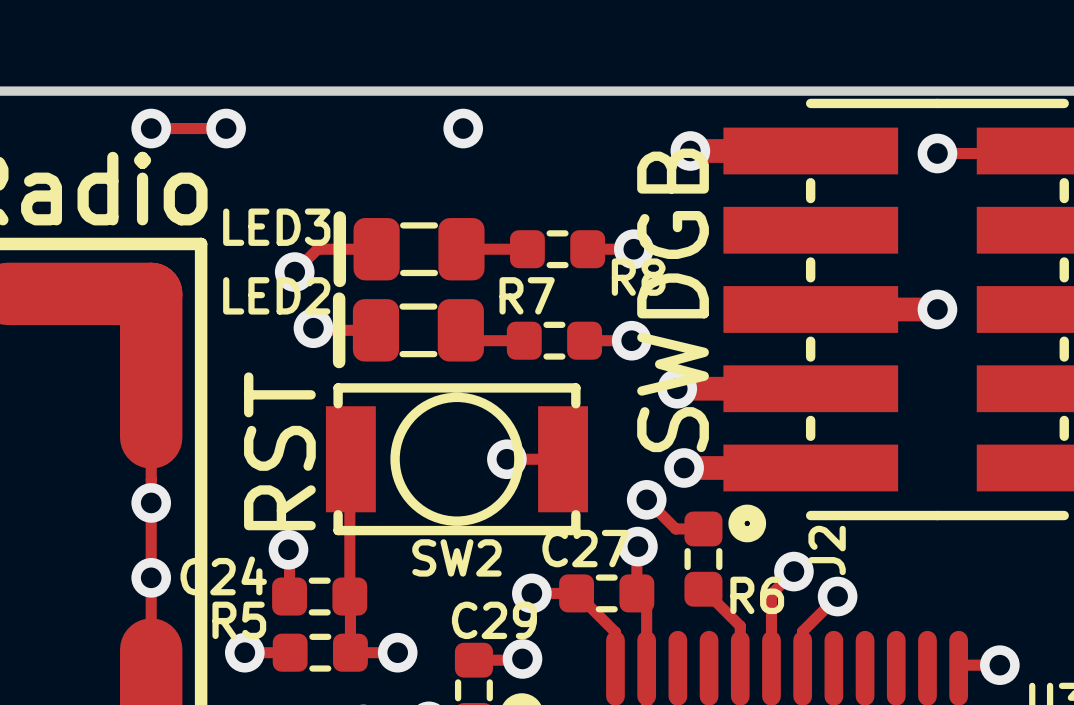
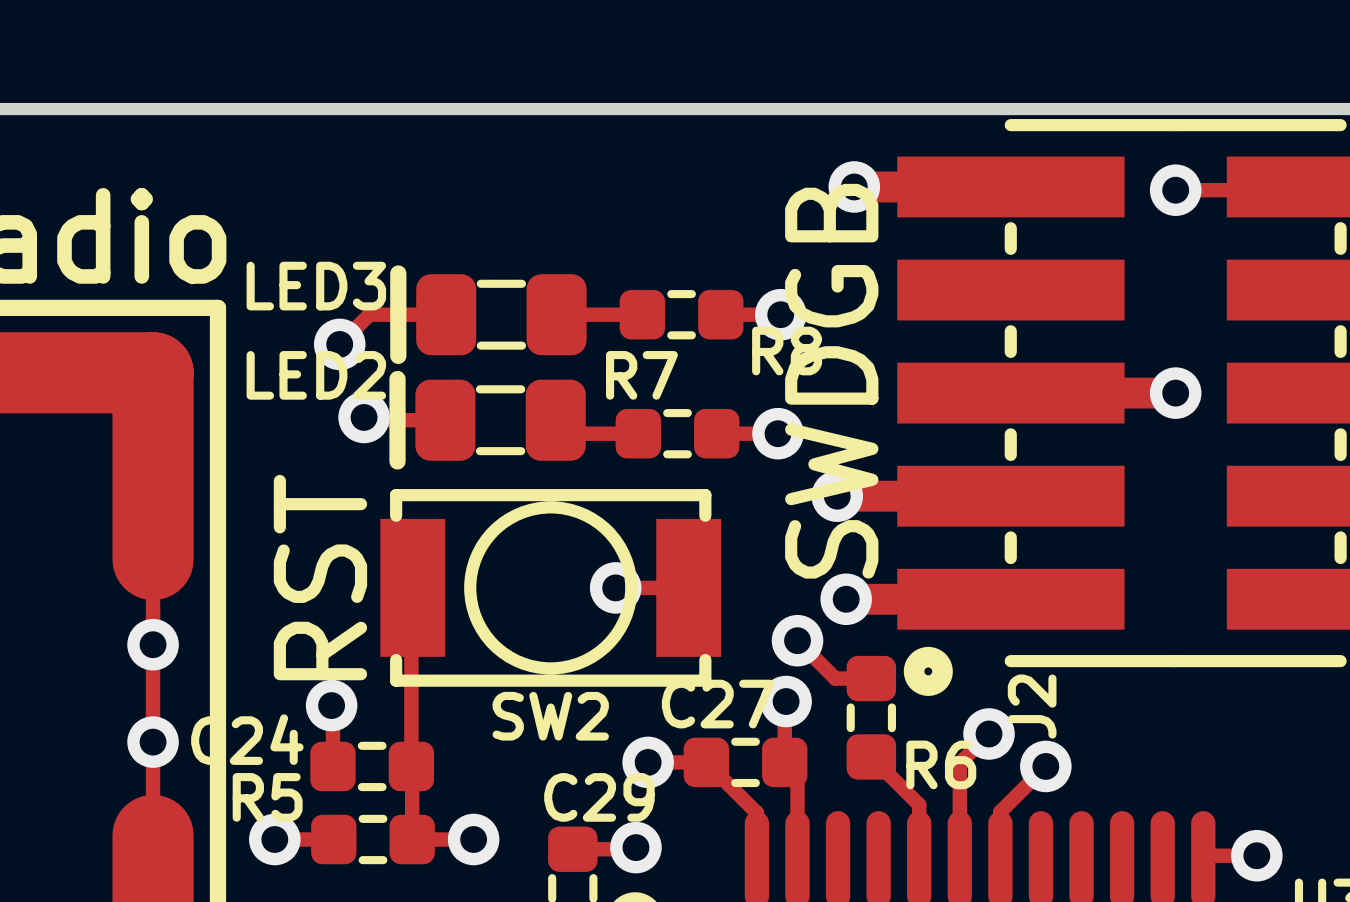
track: (151, 128) (226, 128) -> none
via: (151, 128) -> none
via: (226, 128) -> none
via: (463, 128) -> none

